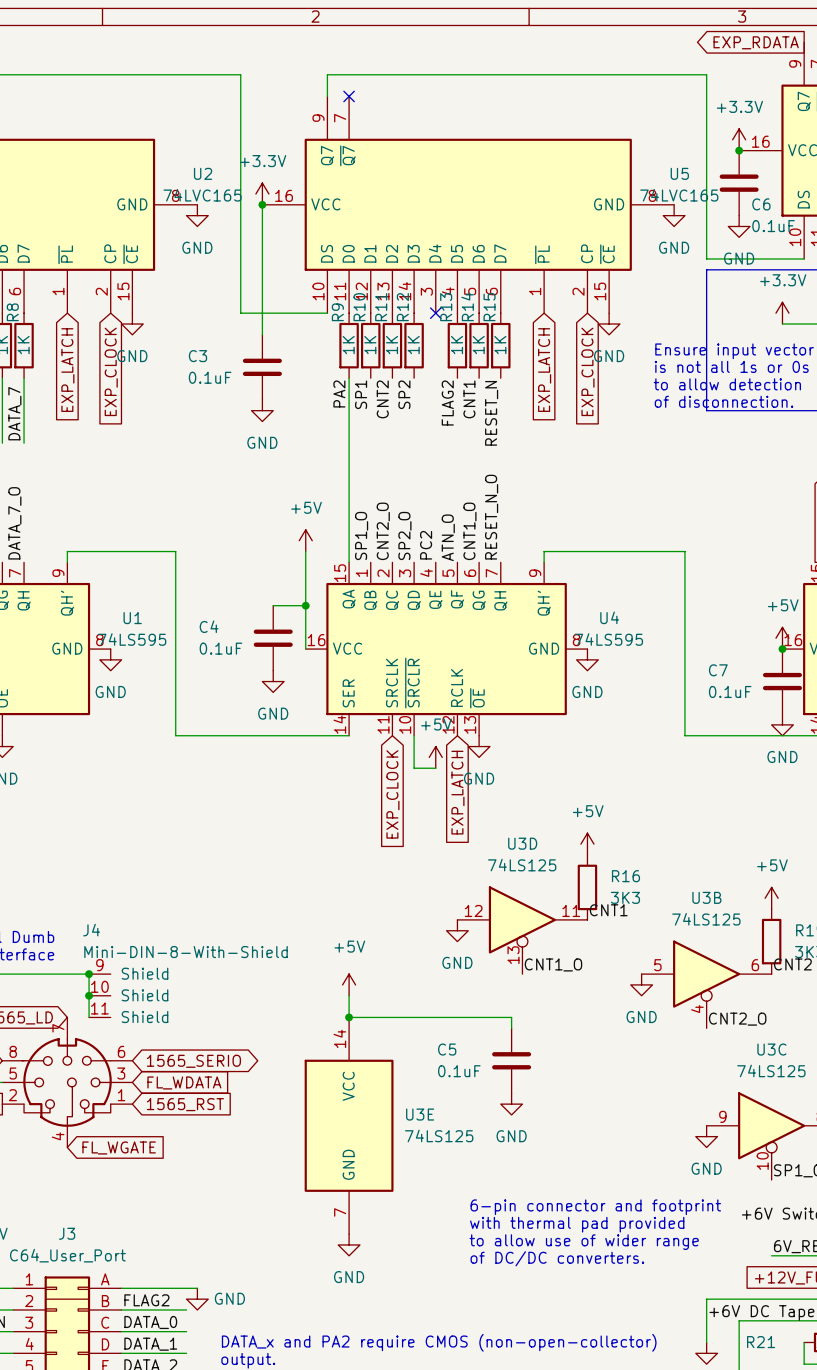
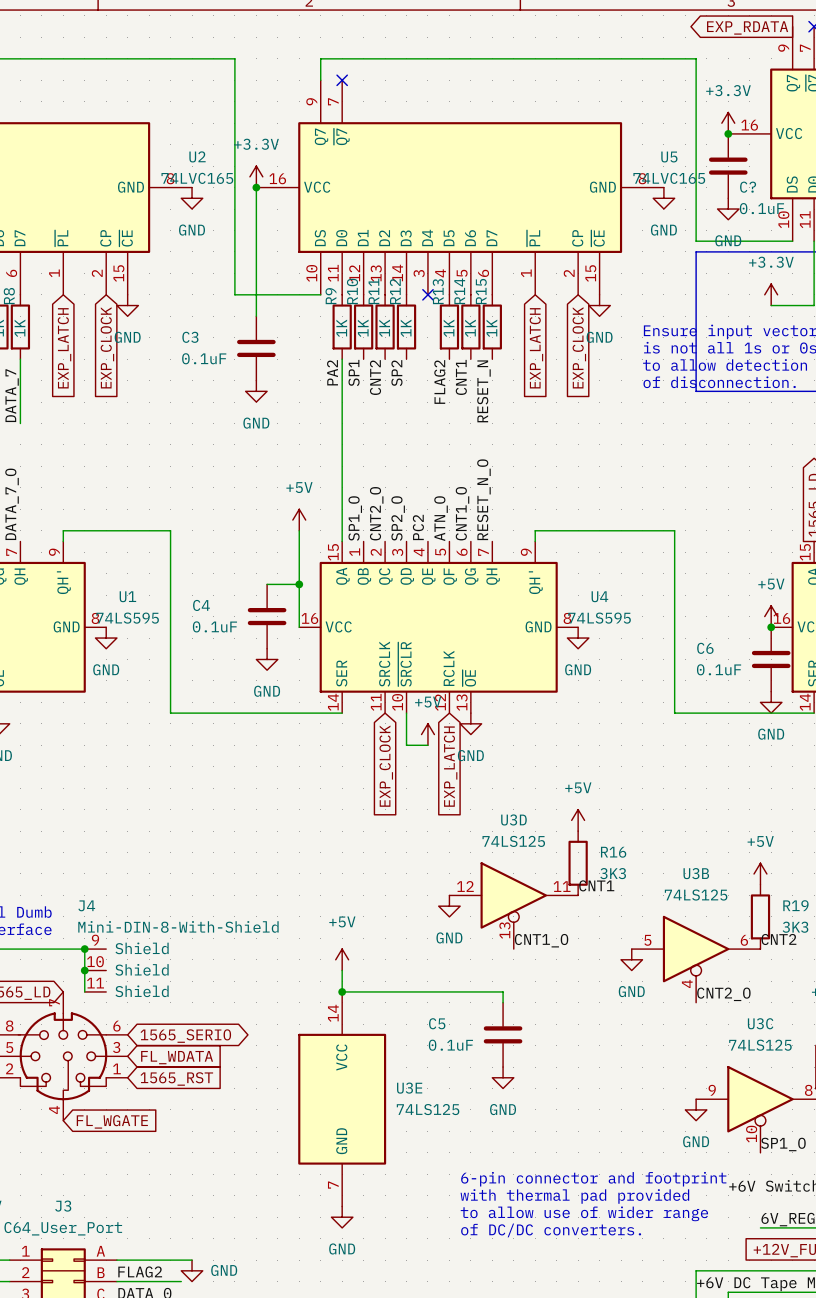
C6 name: C6 (761, 204) -> C? (748, 187)
C7 name: C7 (718, 670) -> C6 (705, 648)

